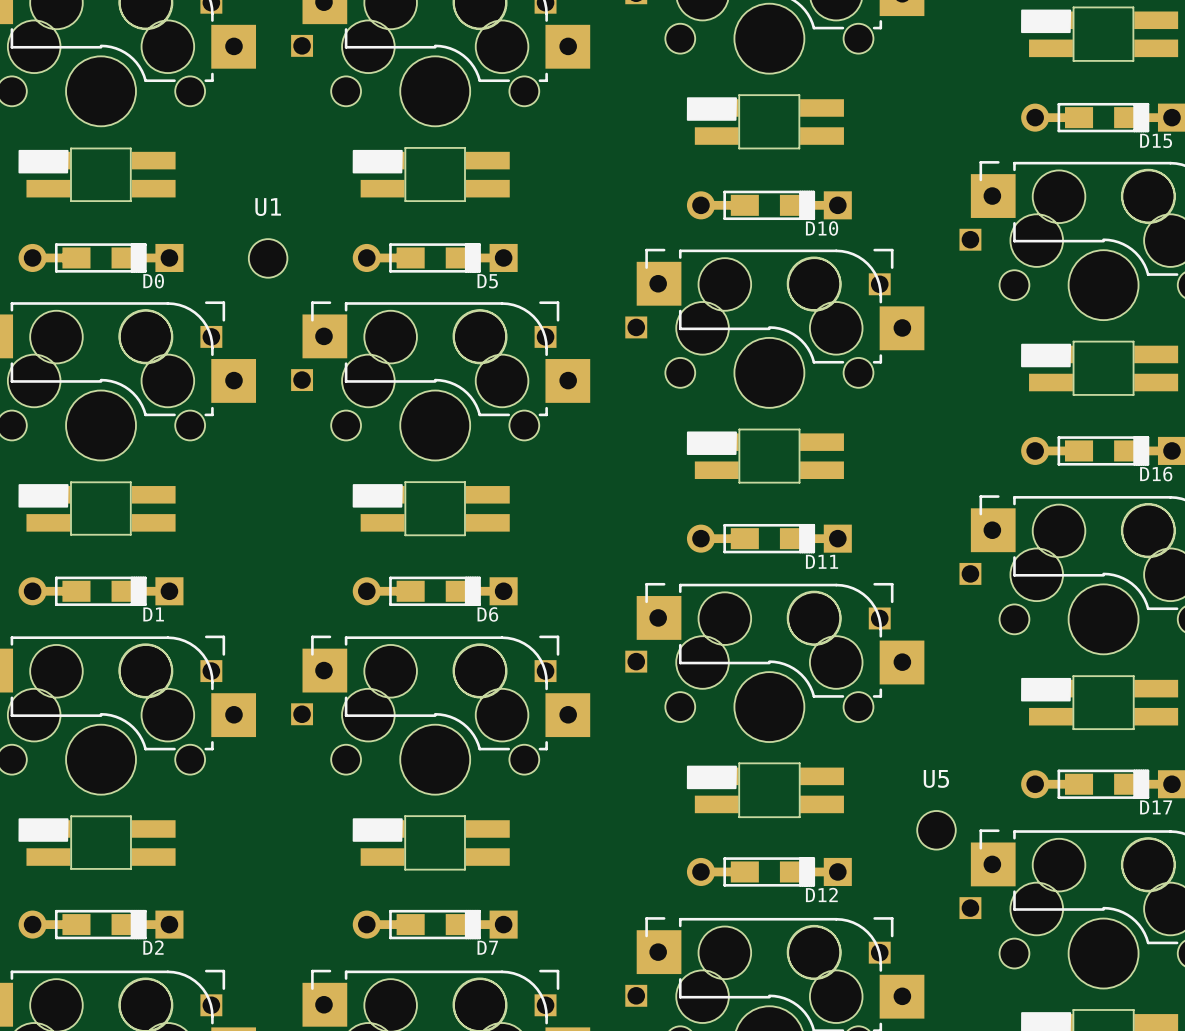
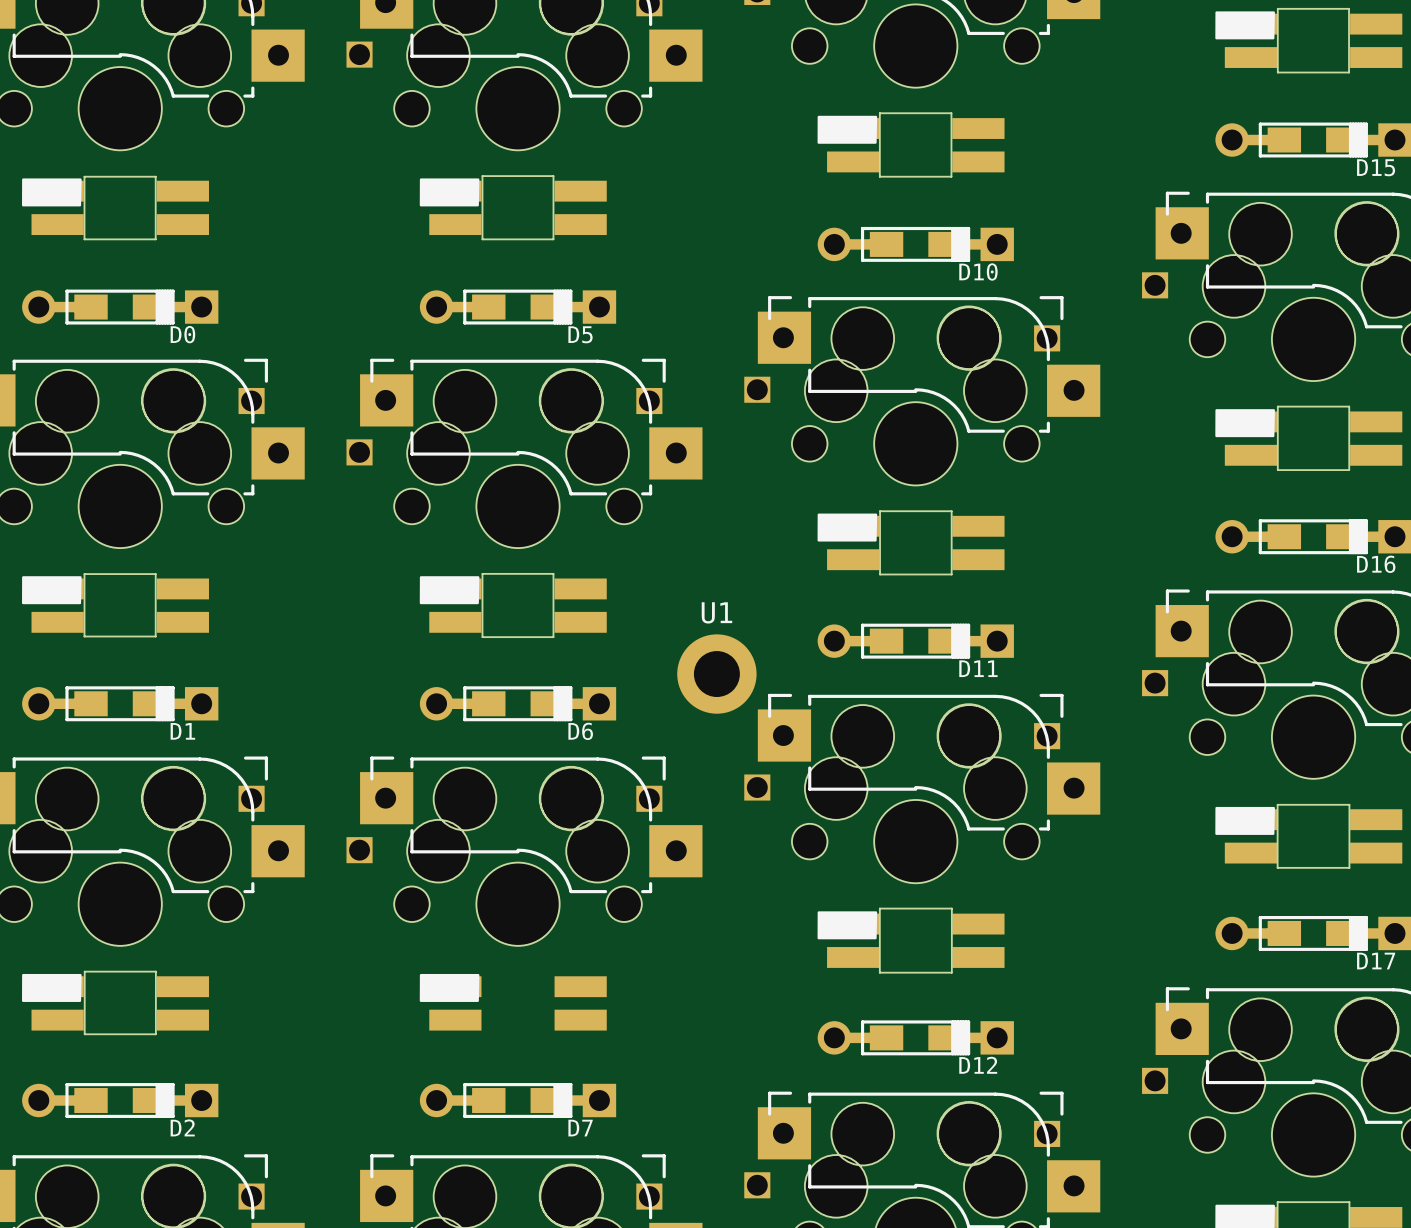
U1 footprint: [248, 239, 288, 278] -> [677, 634, 757, 714]
board edge: (405, 816) (465, 816) (465, 869) (405, 869) (405, 816) -> none
U5: (936, 830) -> none

